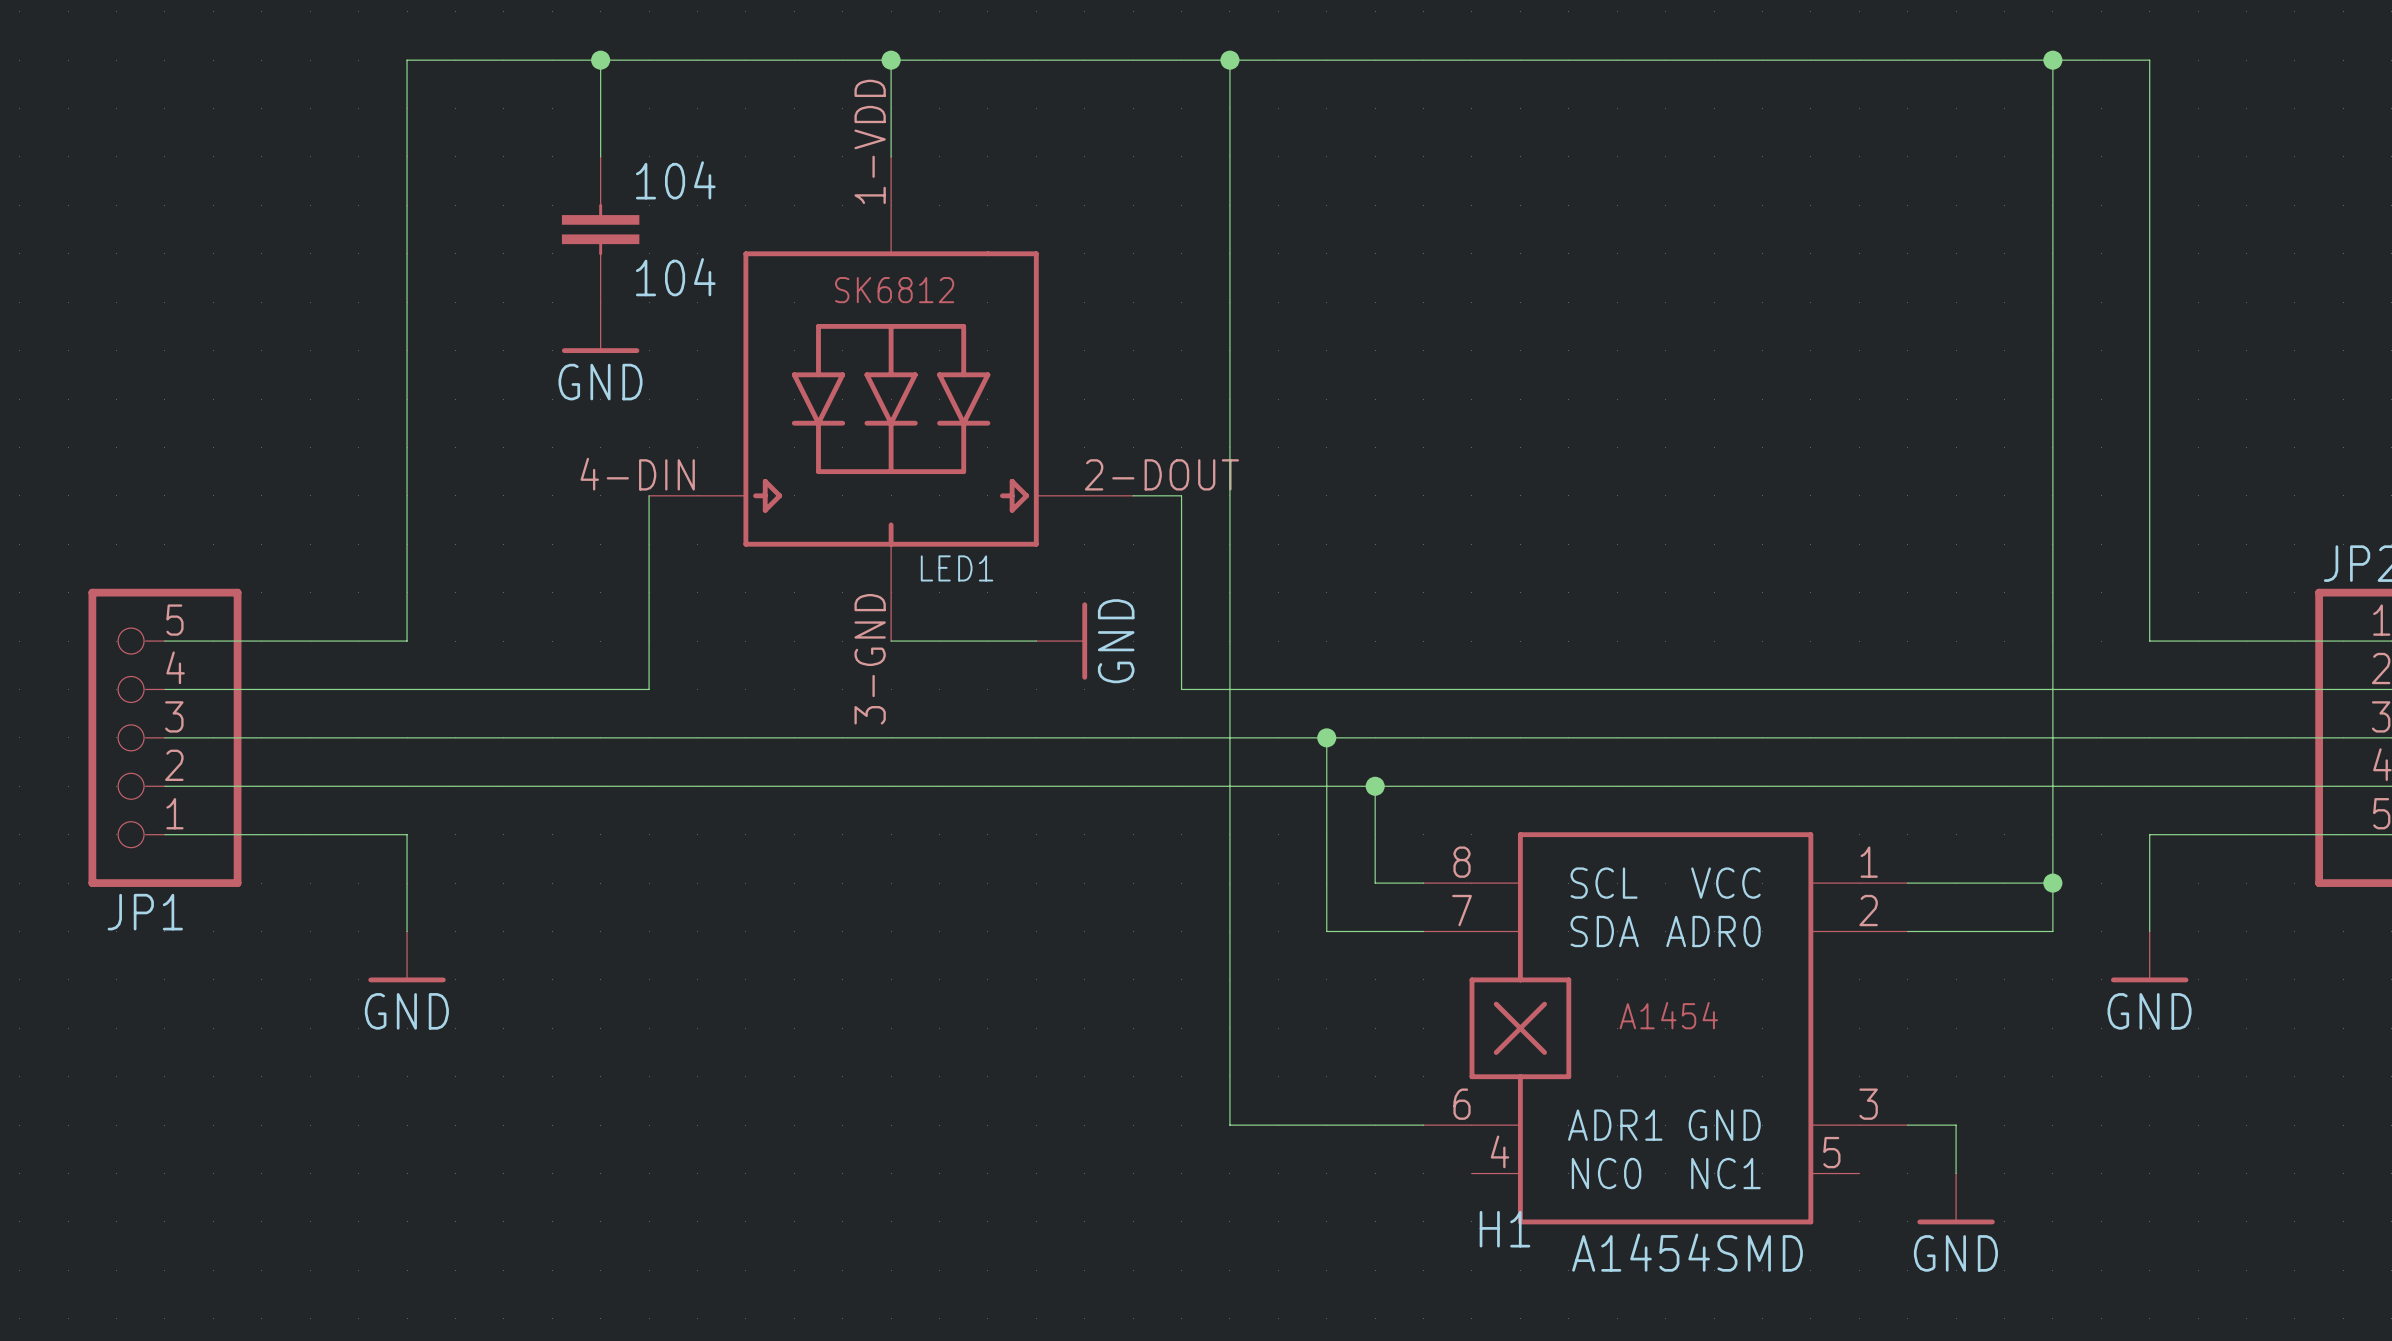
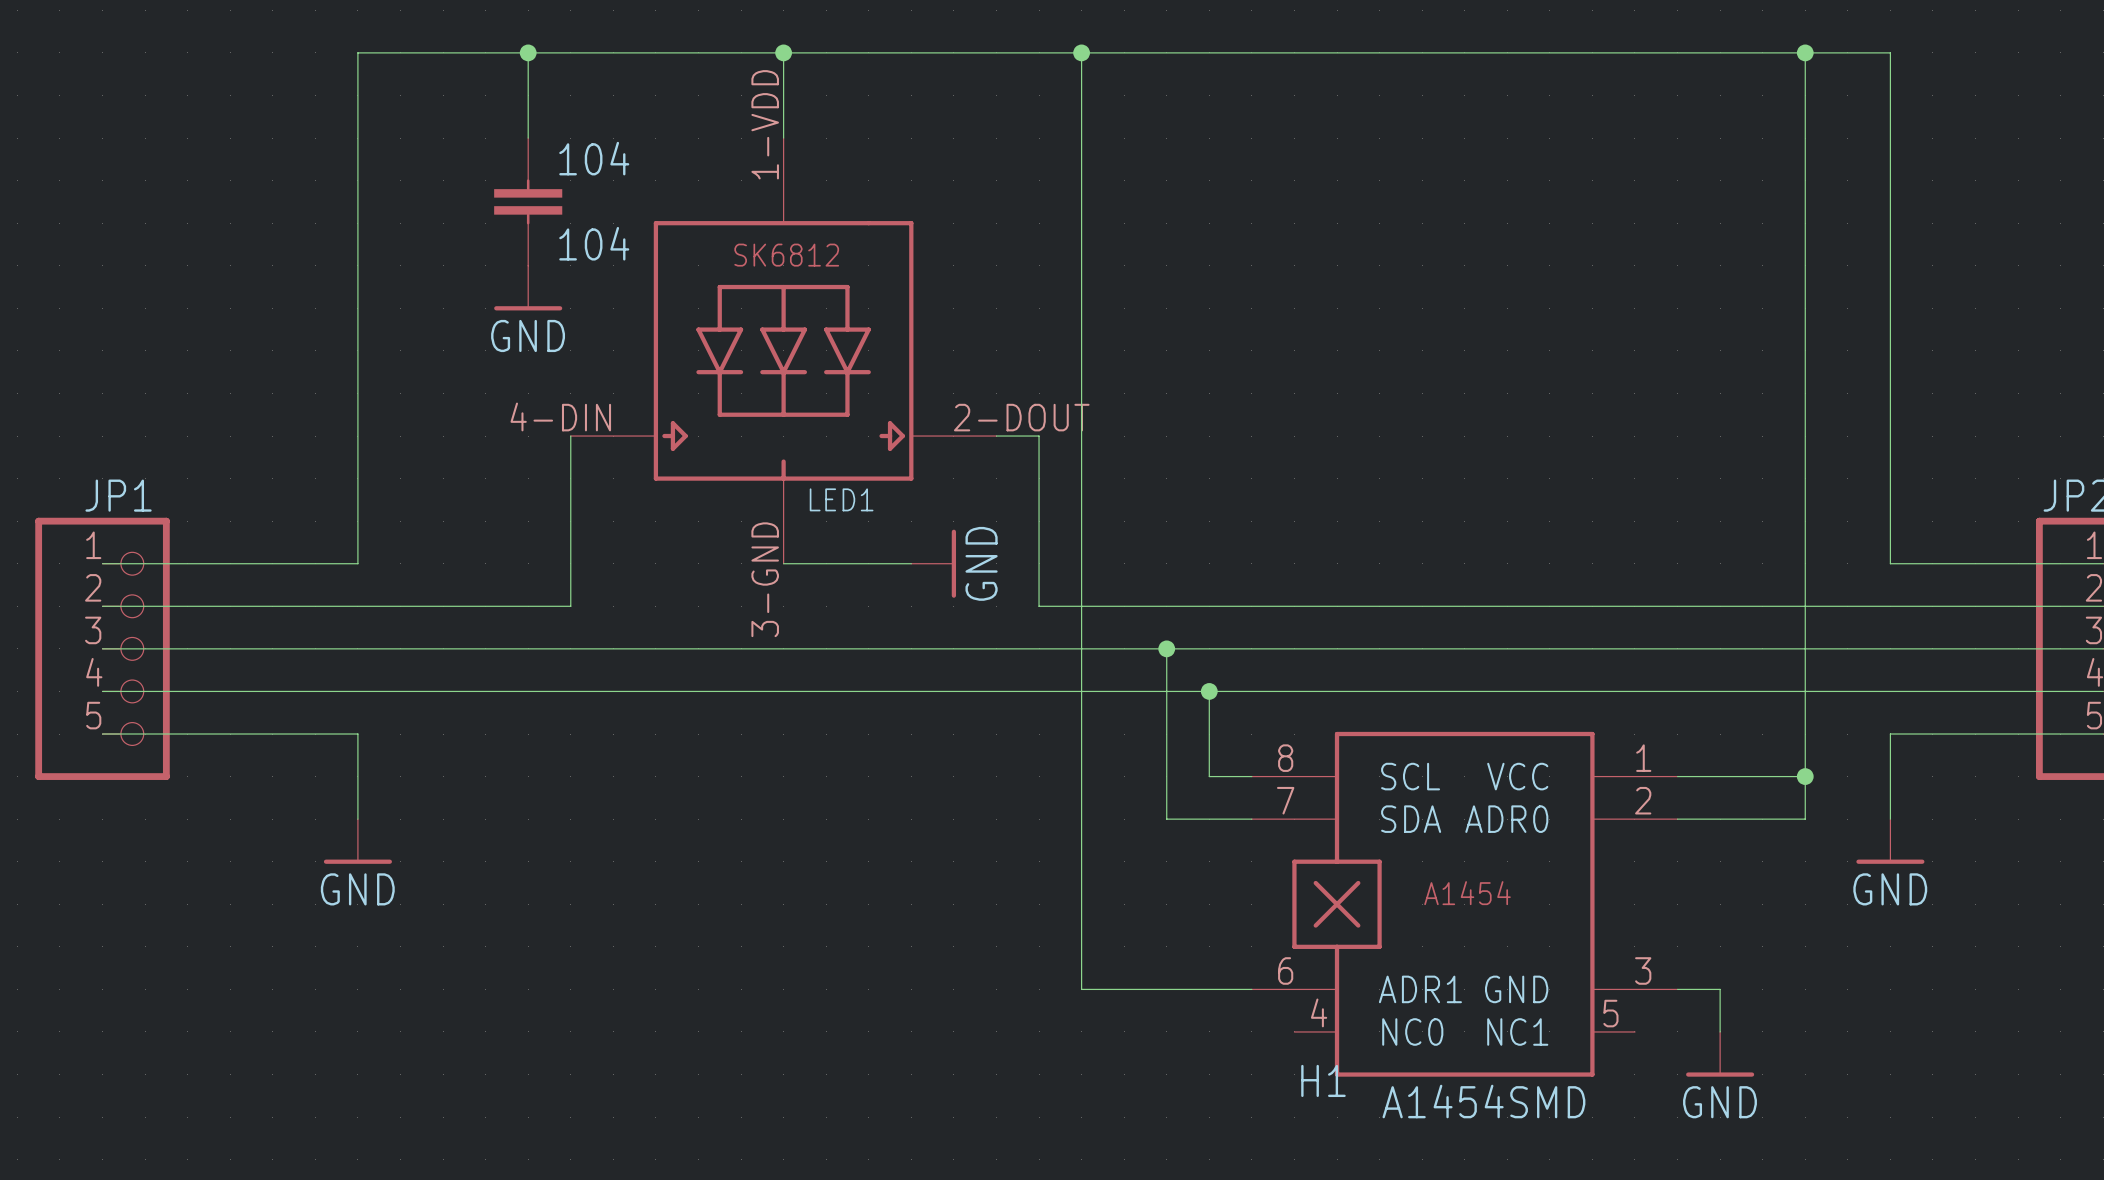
wire: none -> (102, 563) (145, 563)
wire: none -> (102, 606) (145, 606)
wire: none -> (102, 648) (145, 648)
JP1 rotation: 0° (164, 737) -> 180° (102, 648)
wire: none -> (102, 691) (145, 691)
wire: none -> (102, 734) (145, 734)

